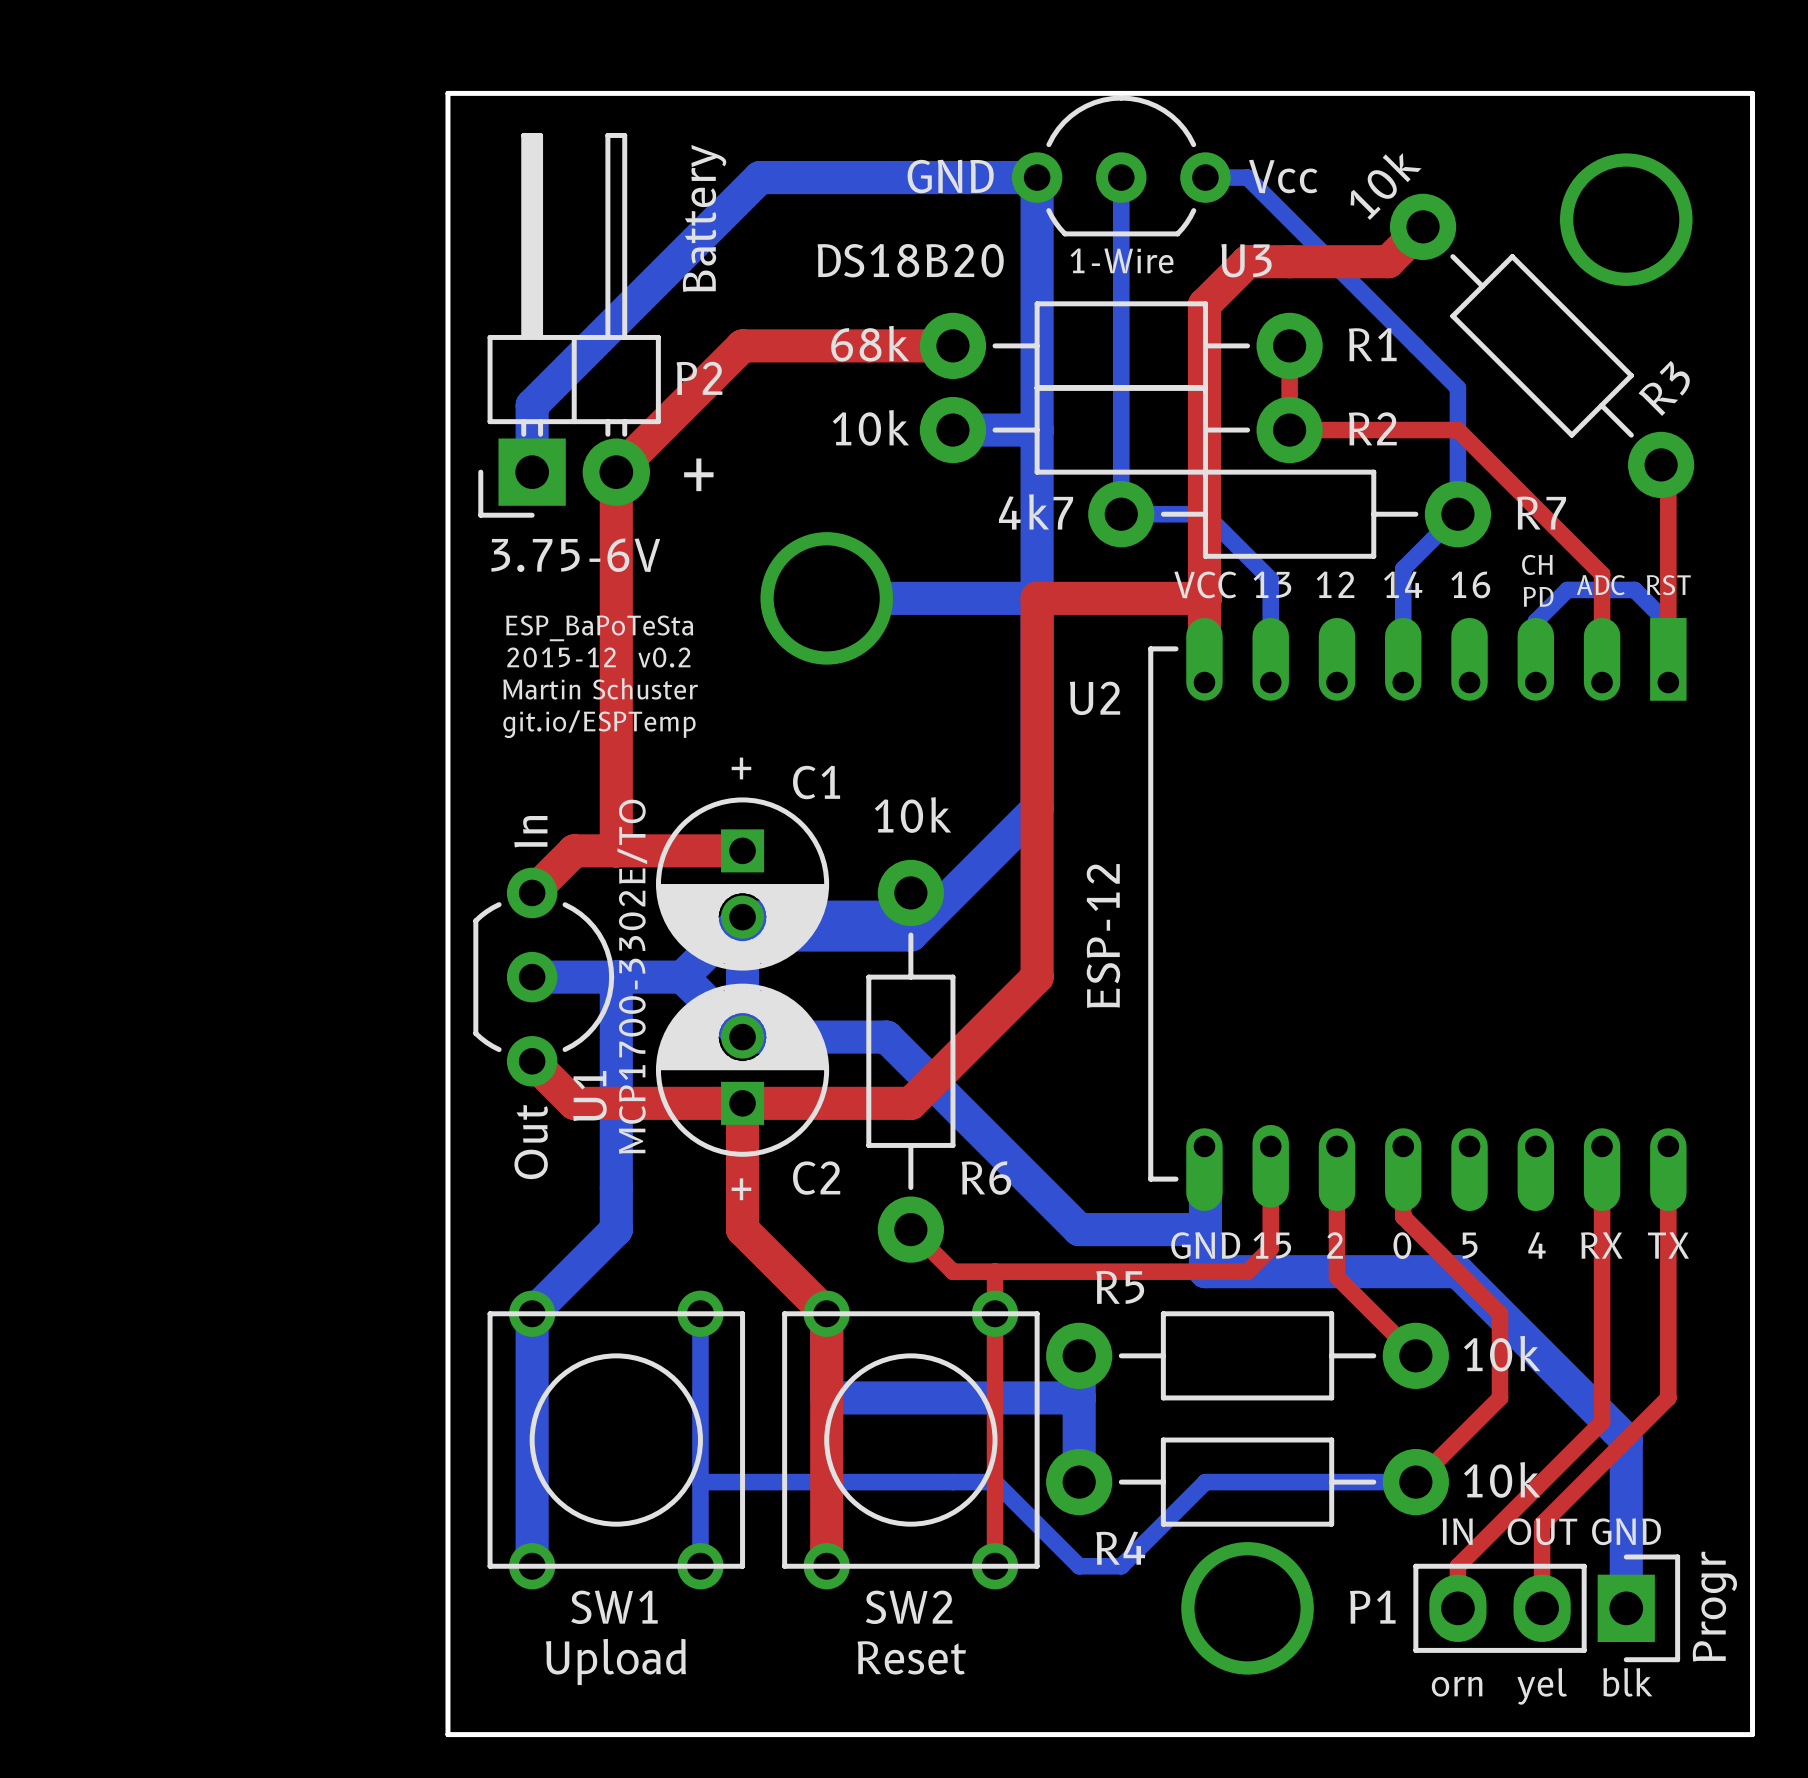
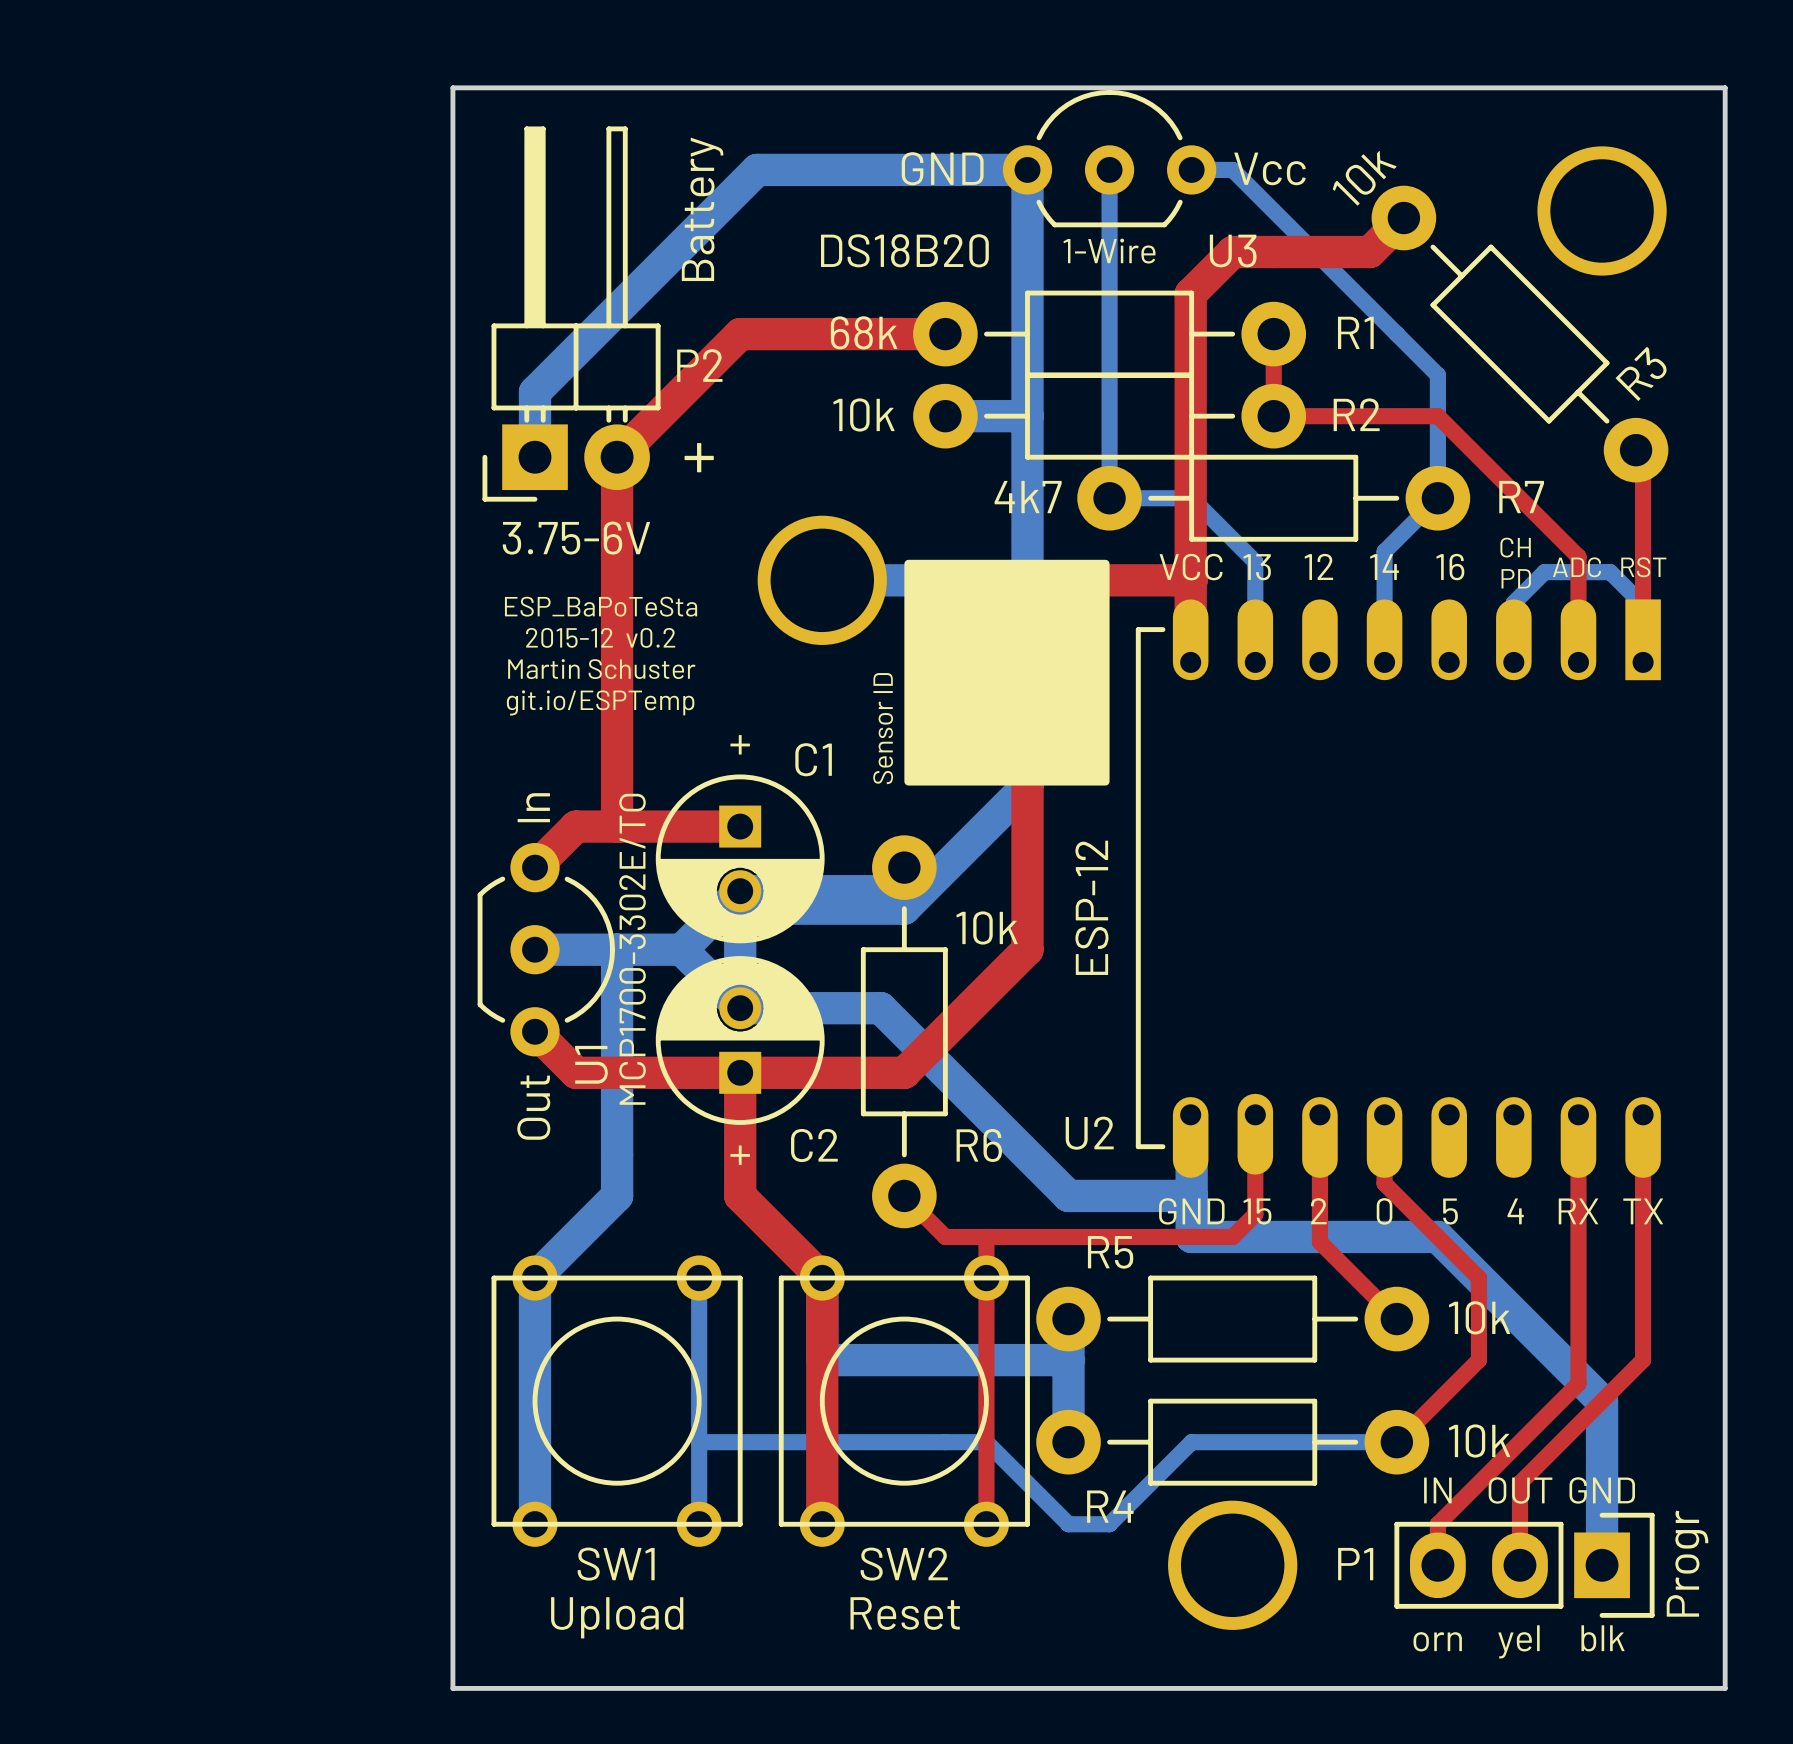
drawing: none -> [904, 559, 1110, 786]
U2 name position: U2 (1095, 698) -> U2 (1089, 1133)
text: none -> Sensor ID (883, 728)
R6 value position: 10k (913, 815) -> 10k (987, 927)

